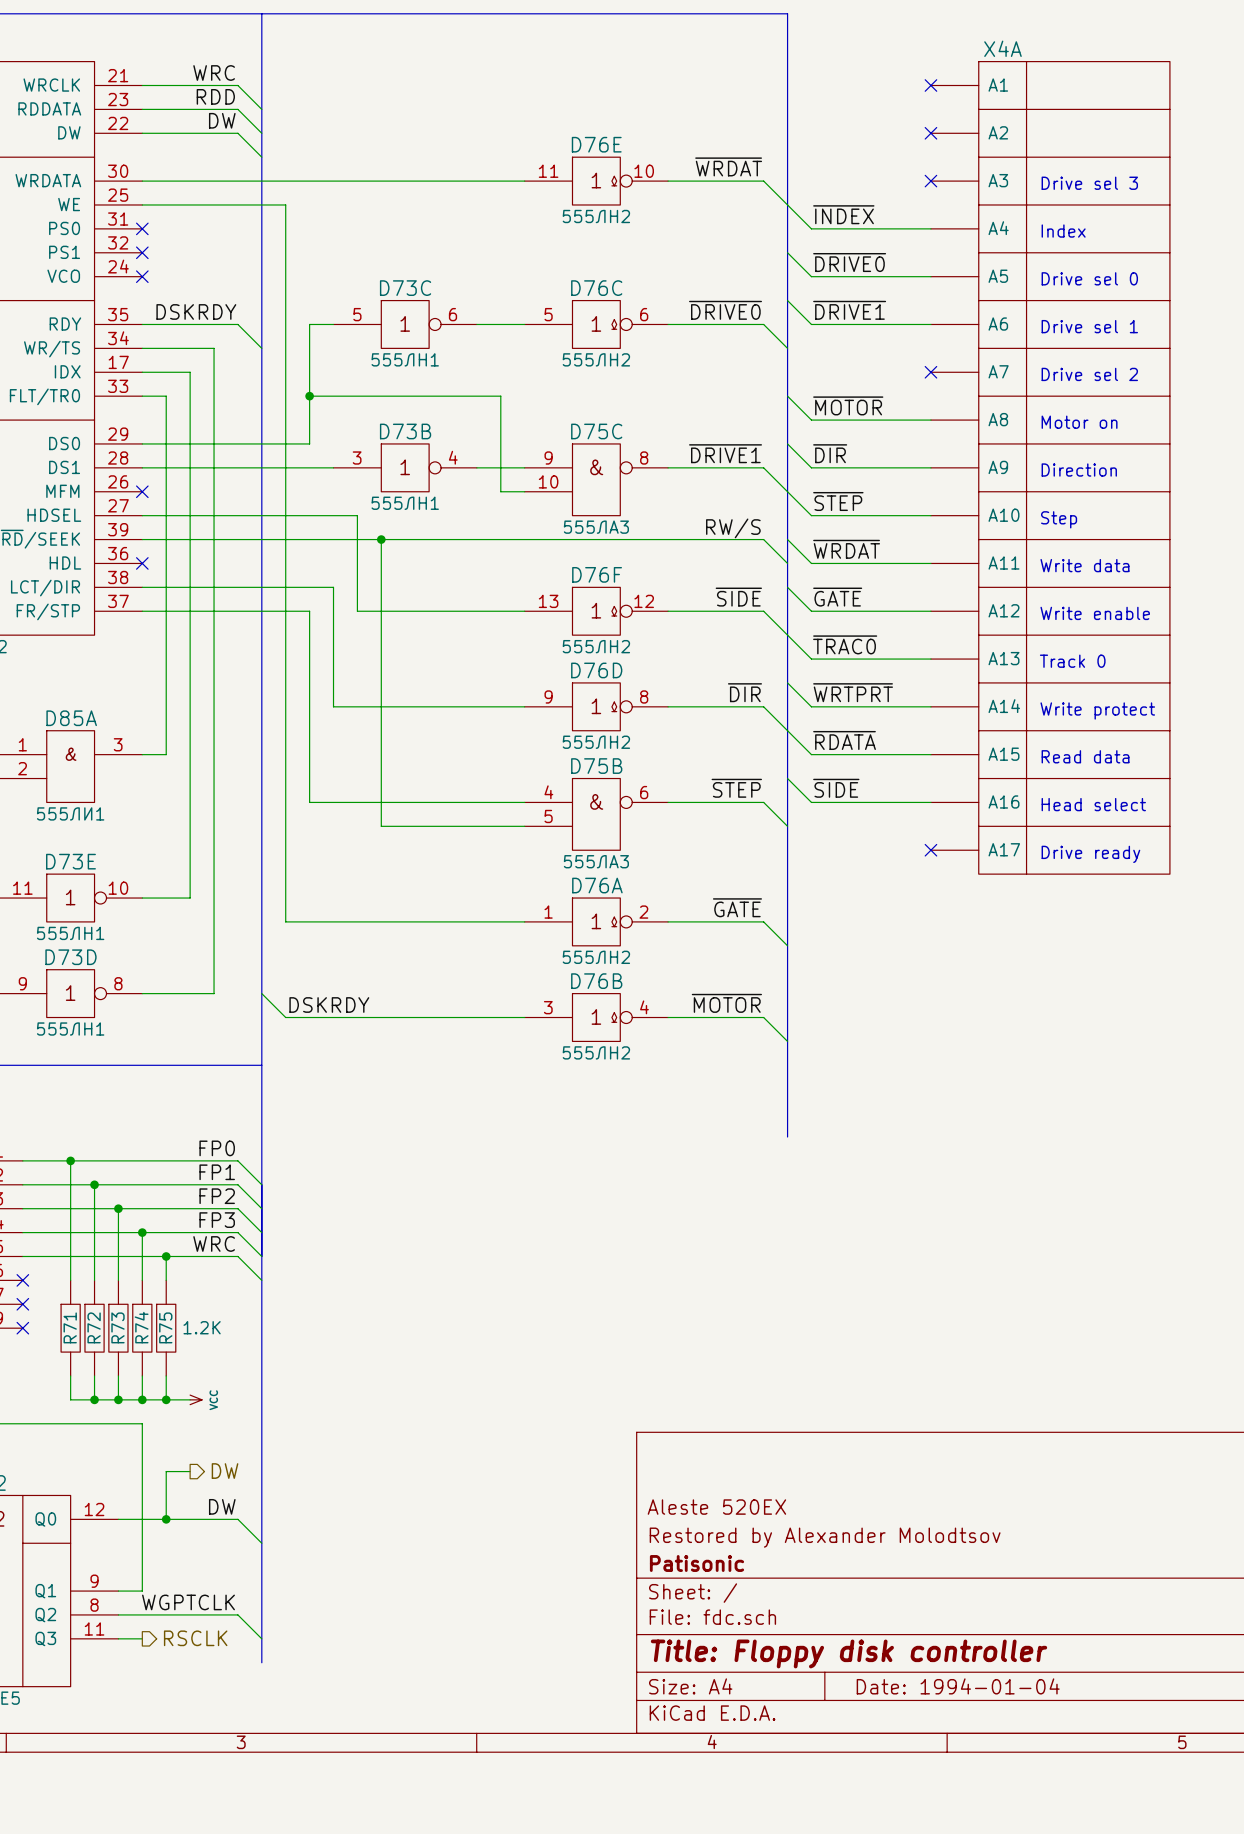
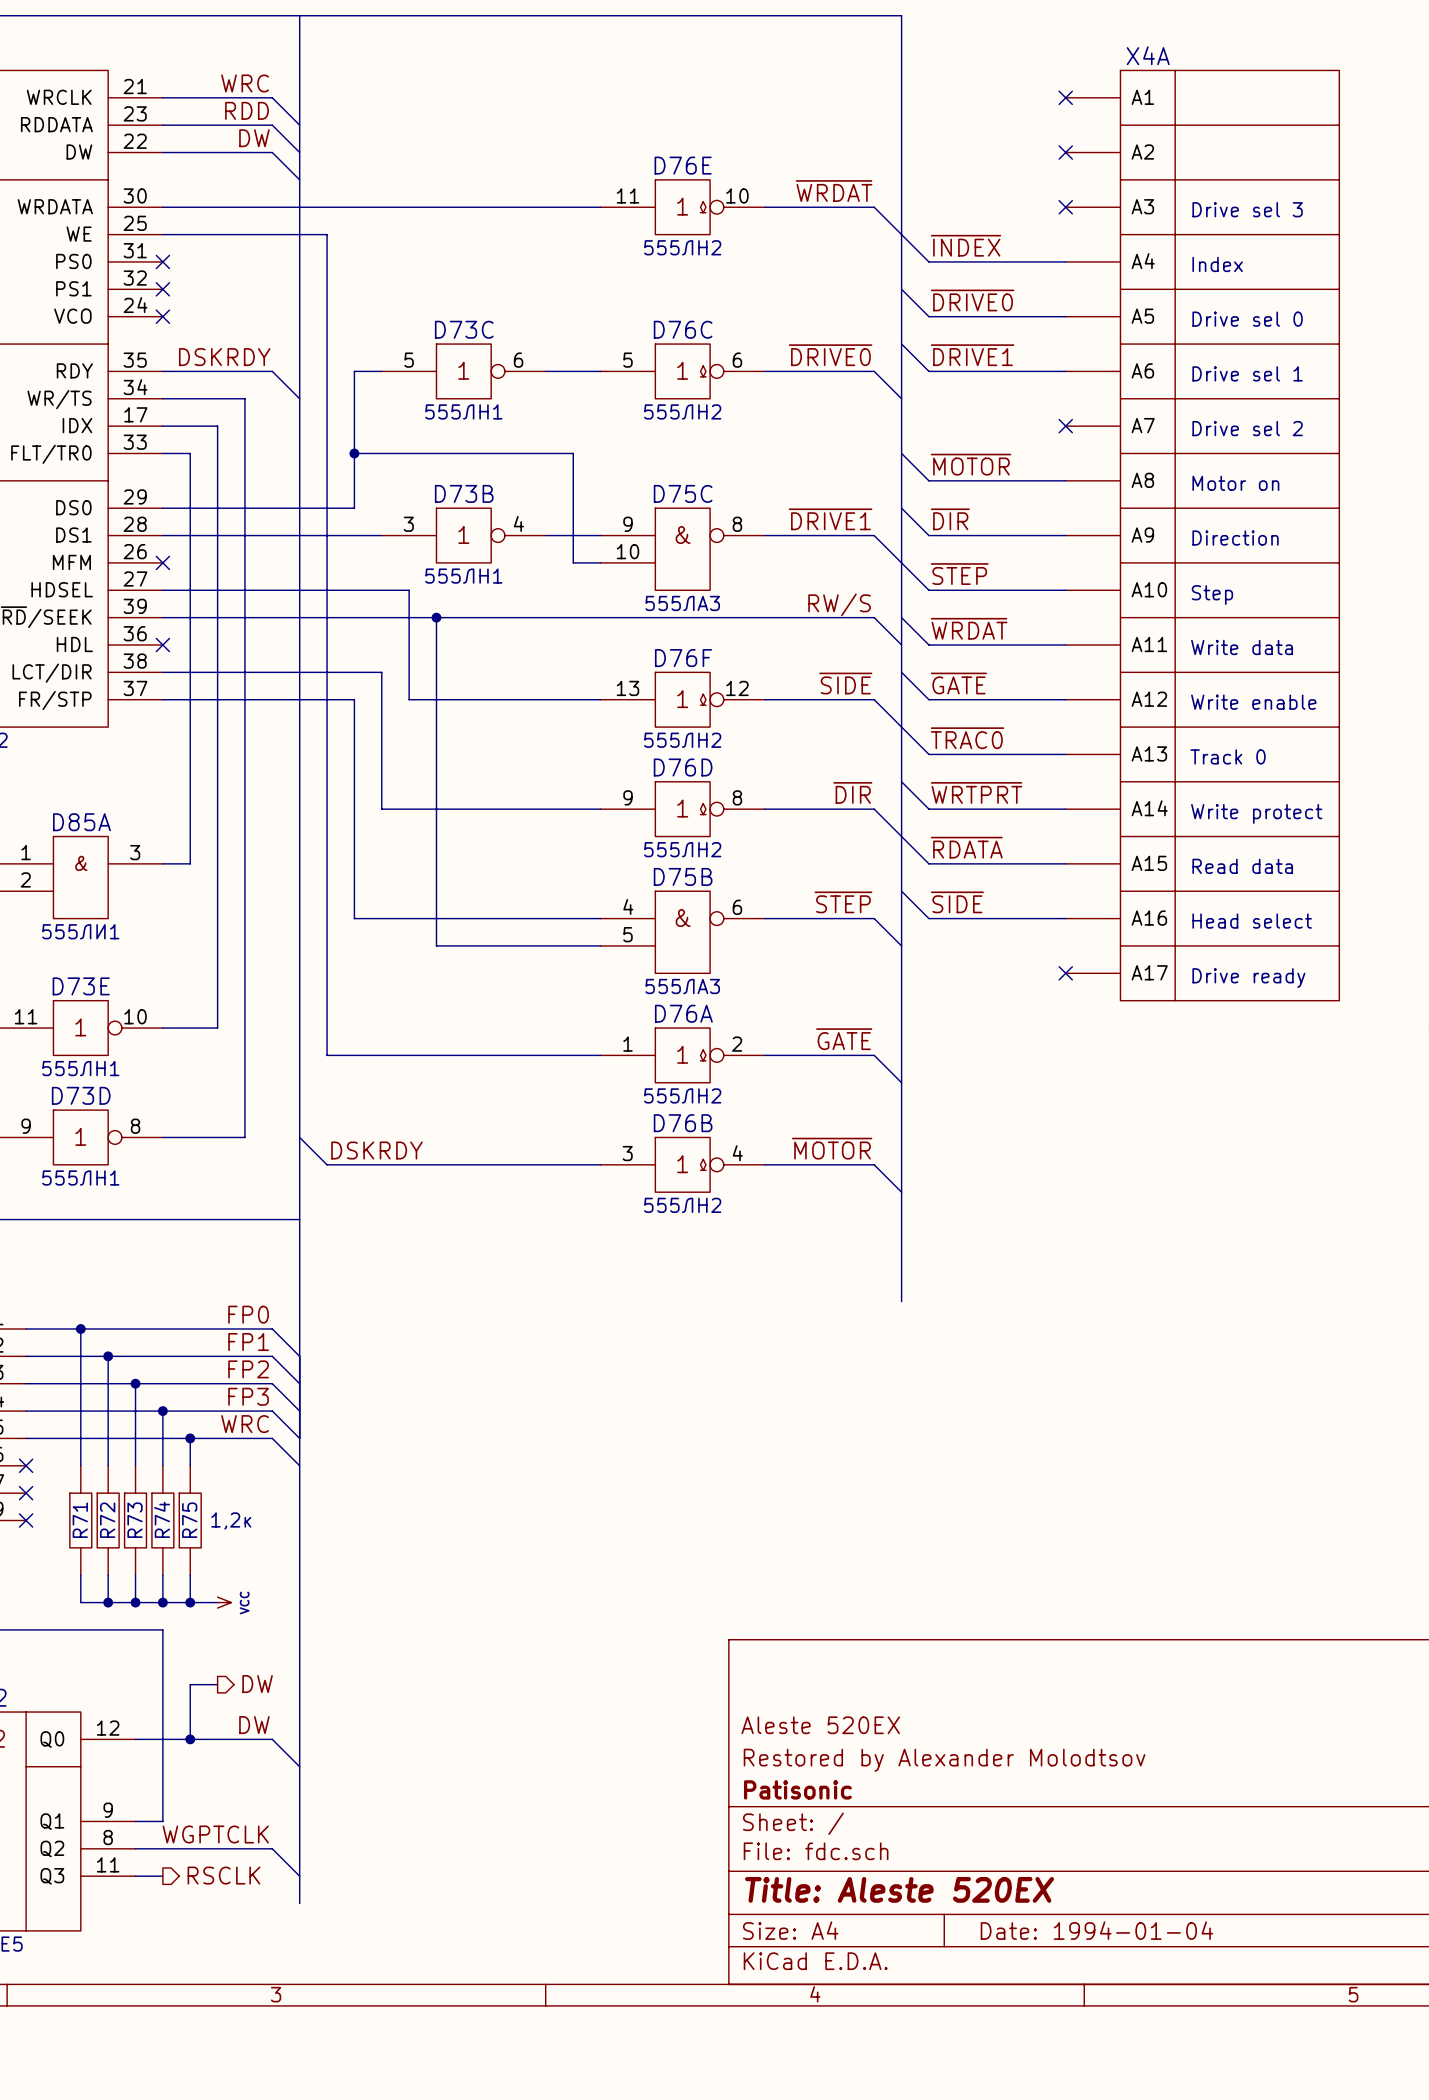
R75 value: 1.2K (202, 1327) -> 1,2к (231, 1520)
title block: Title: Floppy disk controller (848, 1653) -> Title: Aleste 520EX (899, 1889)

